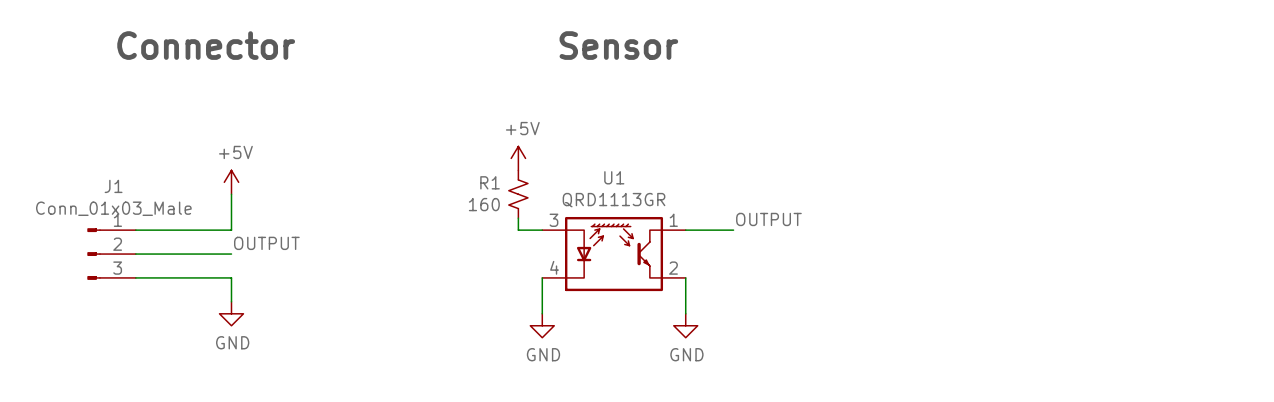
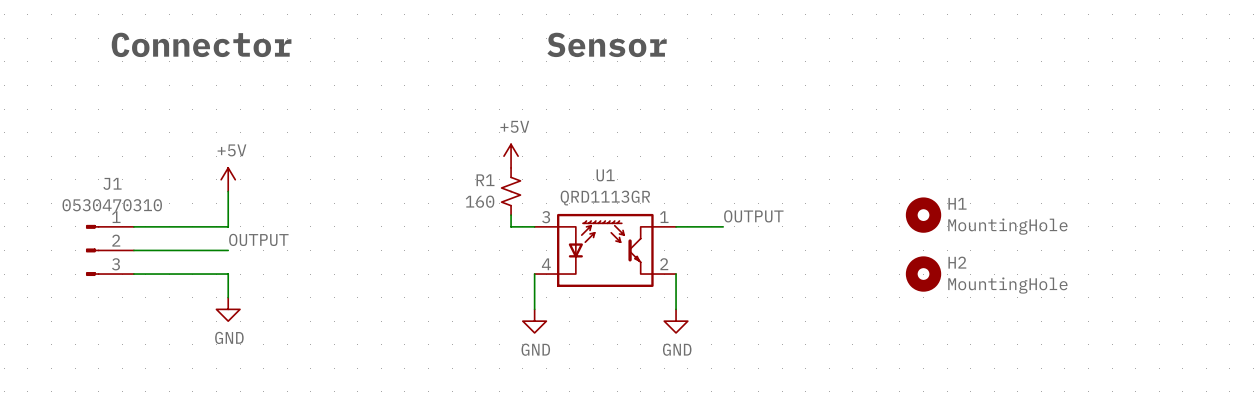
J1 value: Conn_01x03_Male (113, 208) -> 0530470310 (112, 205)
H1: none -> MountingHole (923, 215)
H2: none -> MountingHole (923, 274)

